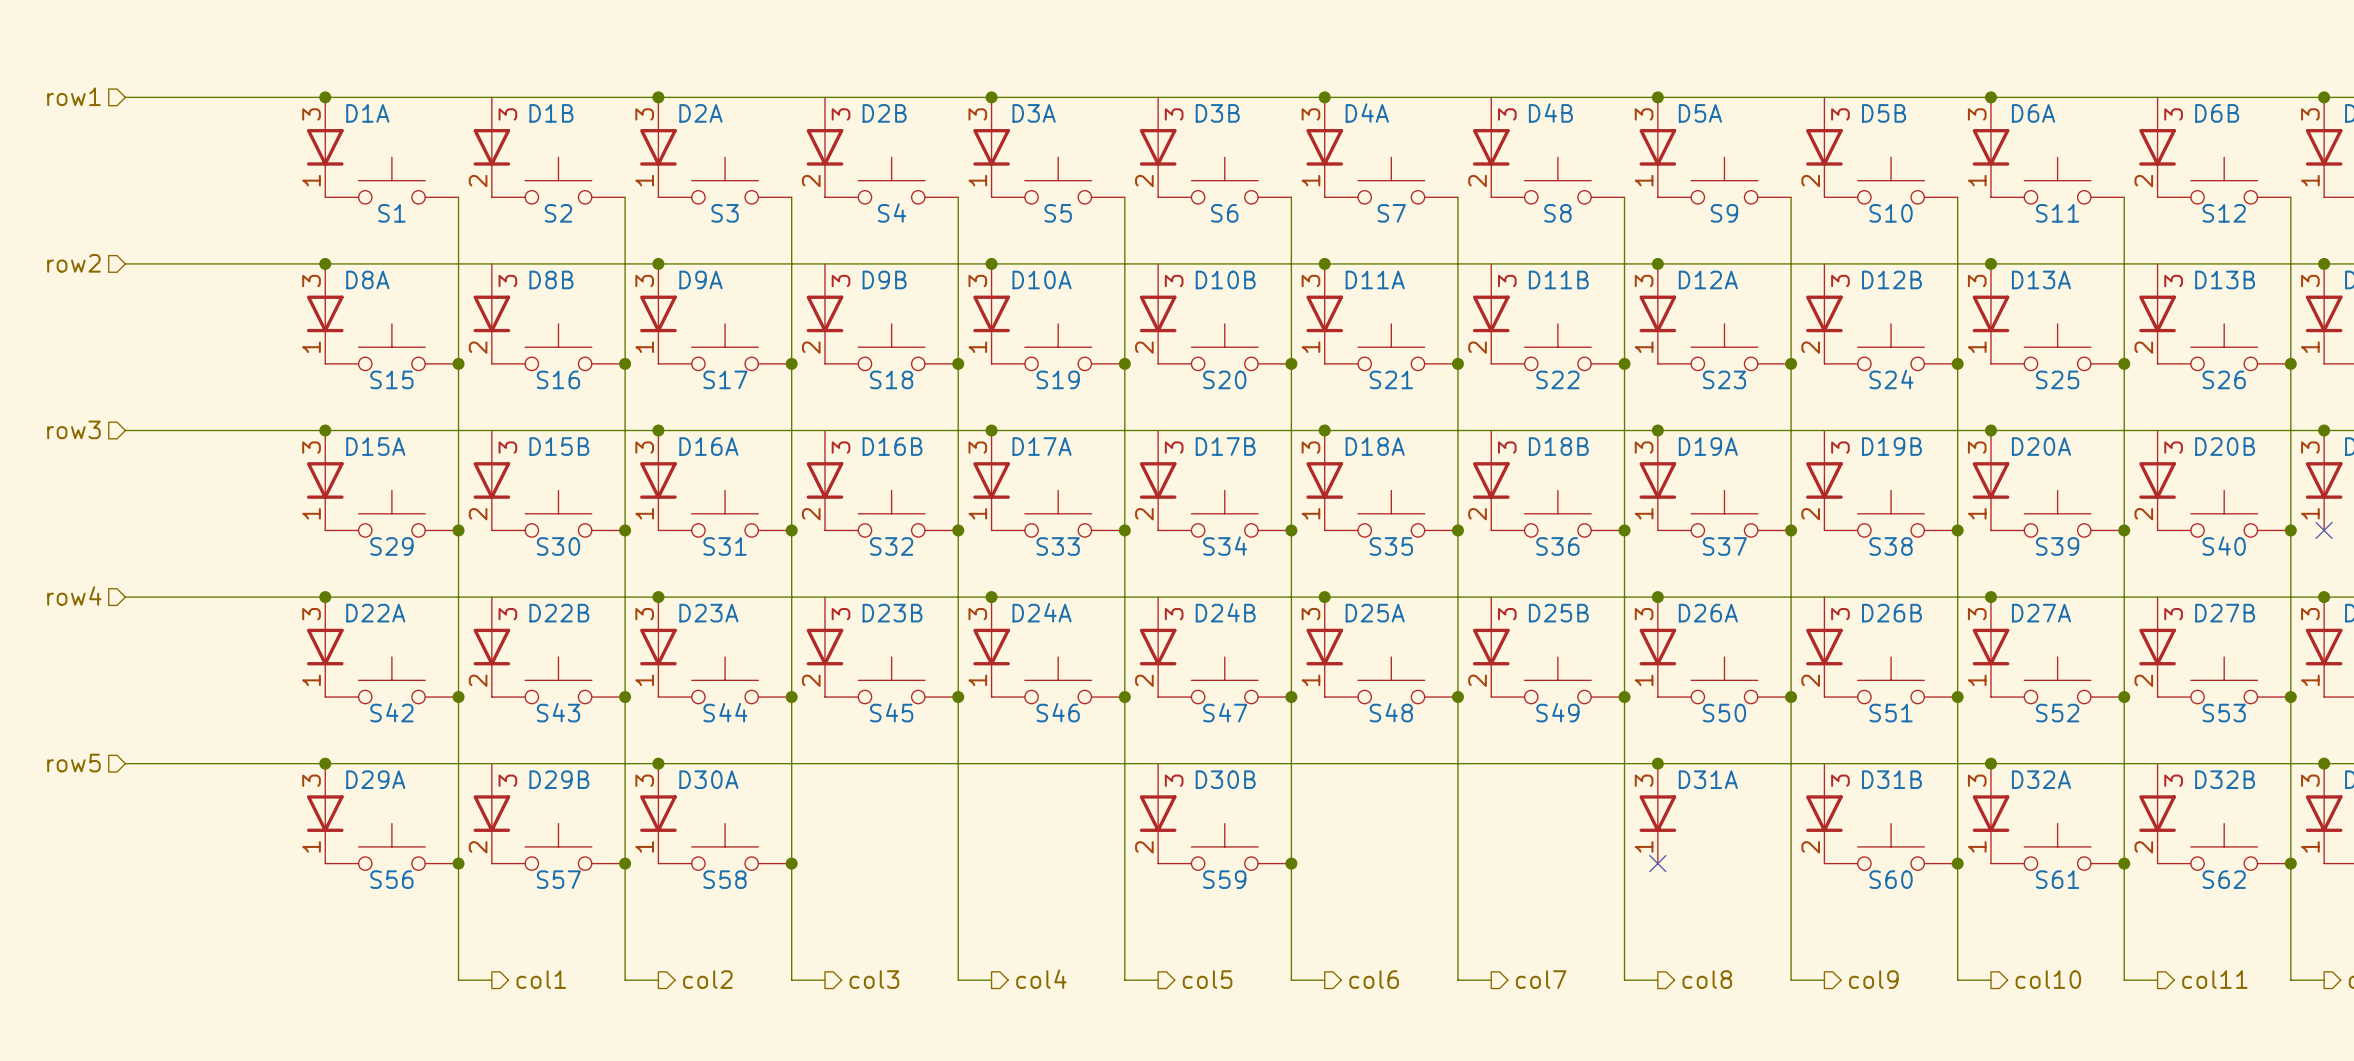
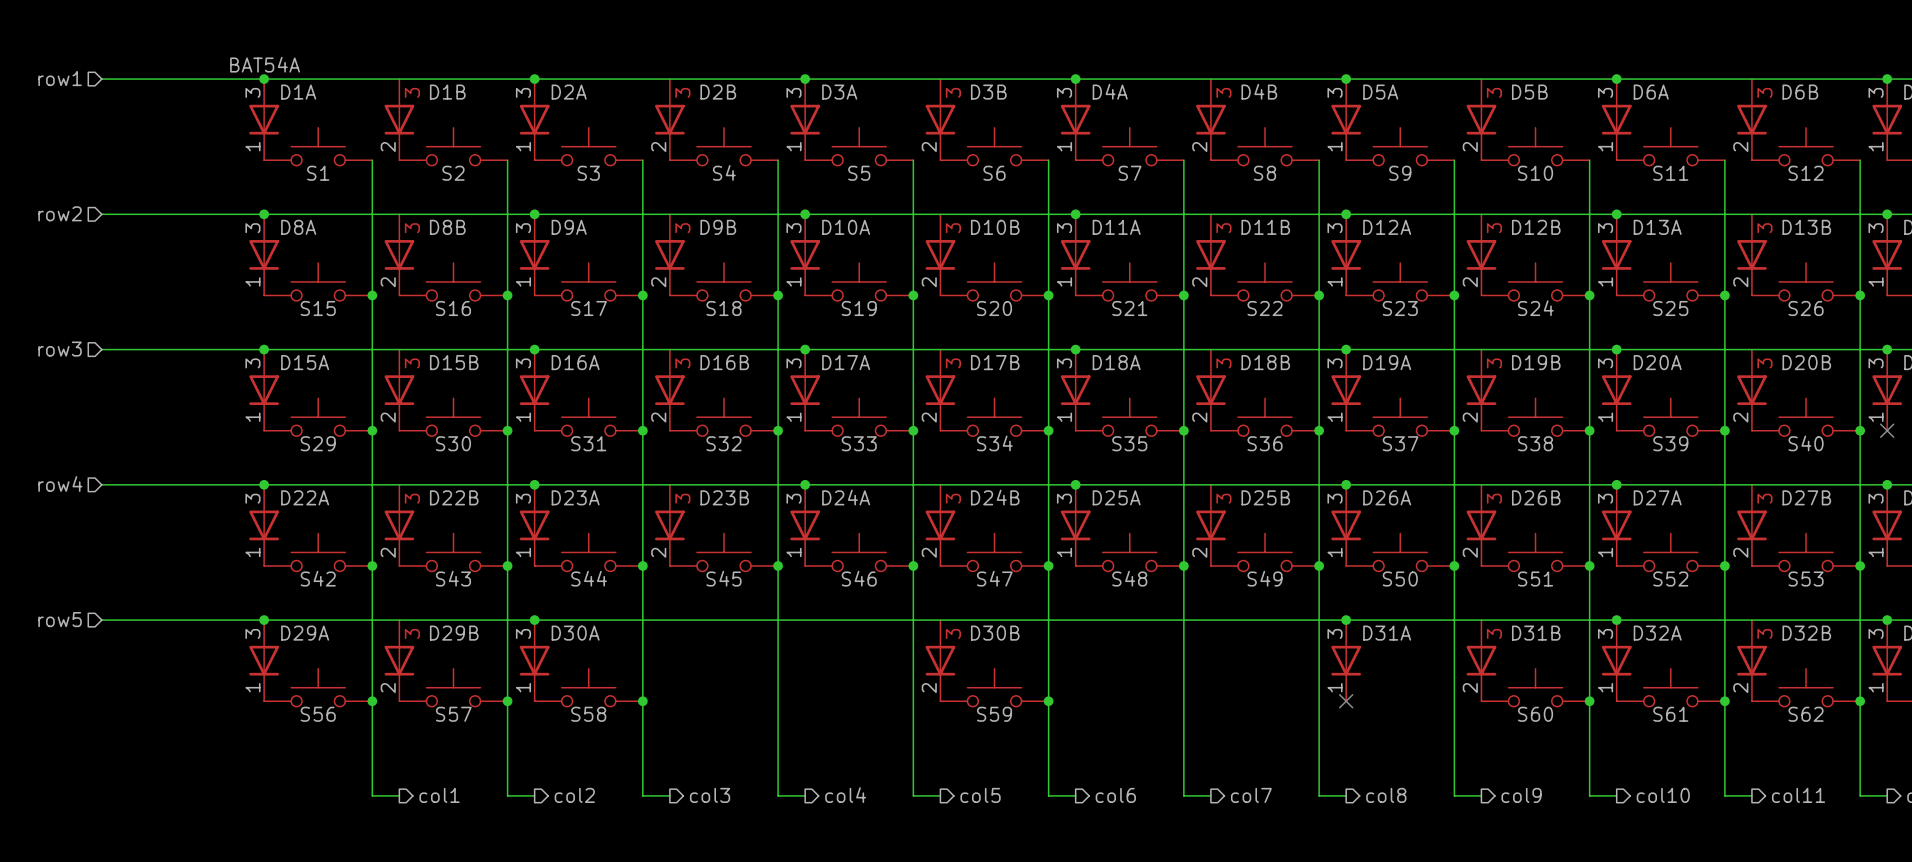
D1A value: none -> BAT54A (265, 64)

